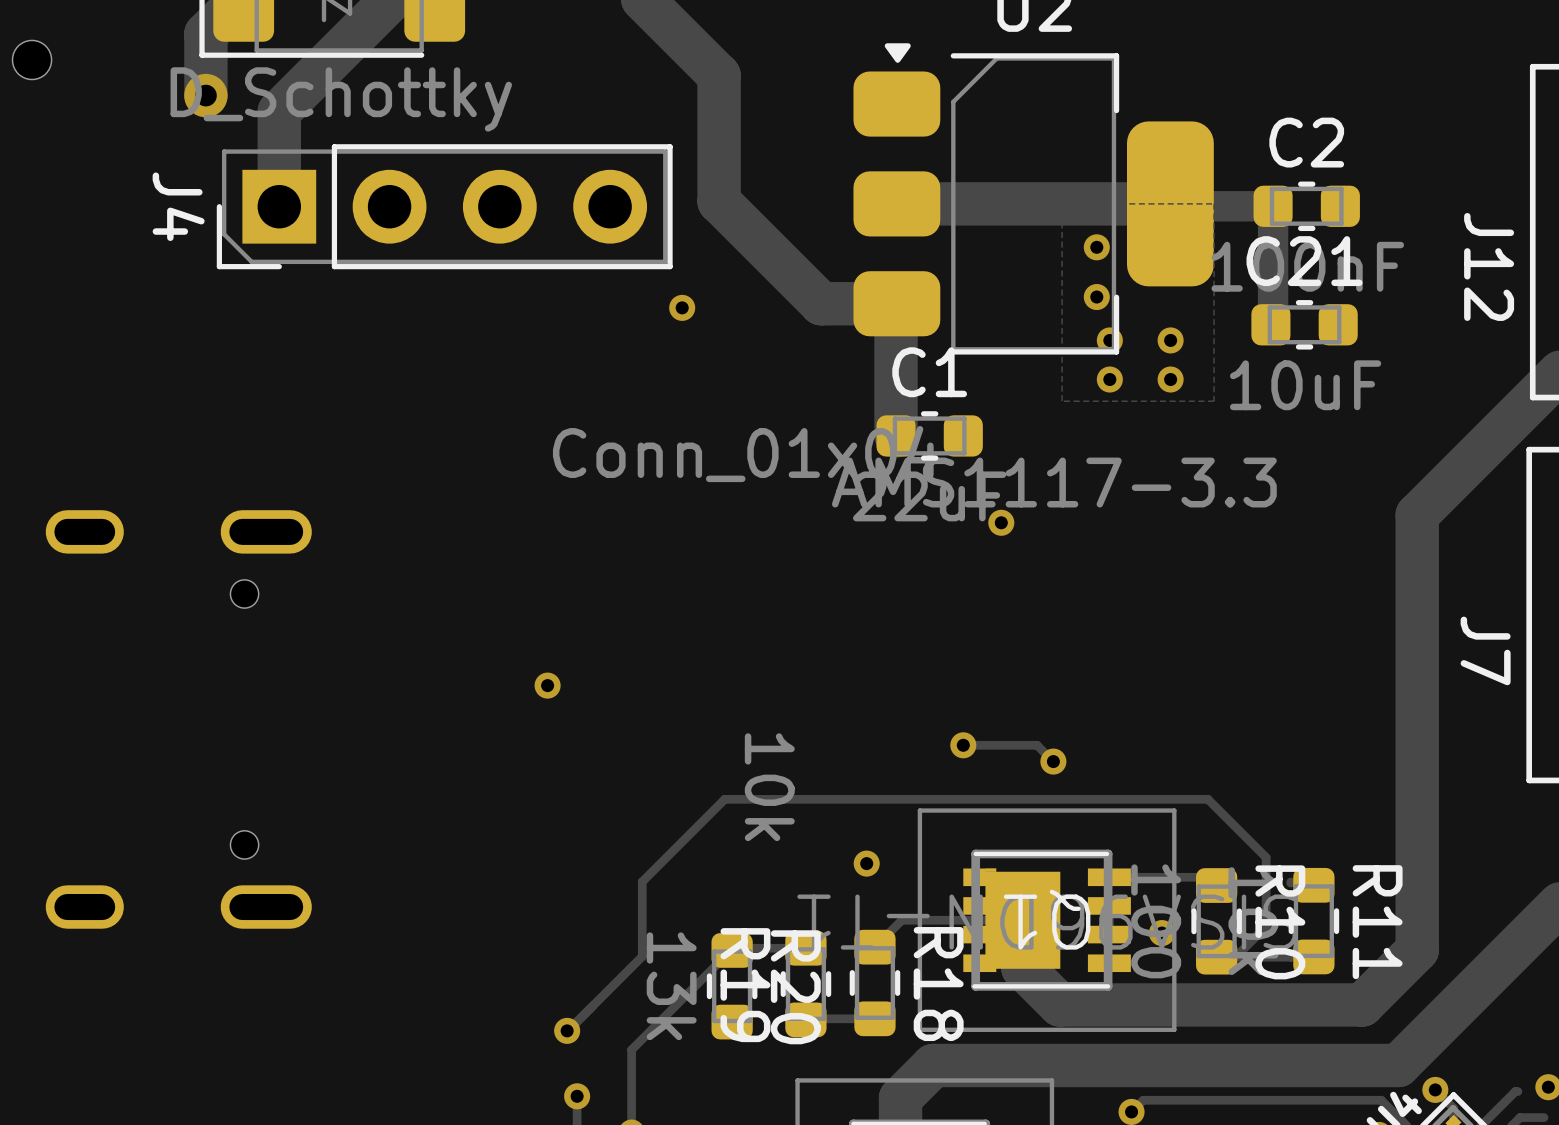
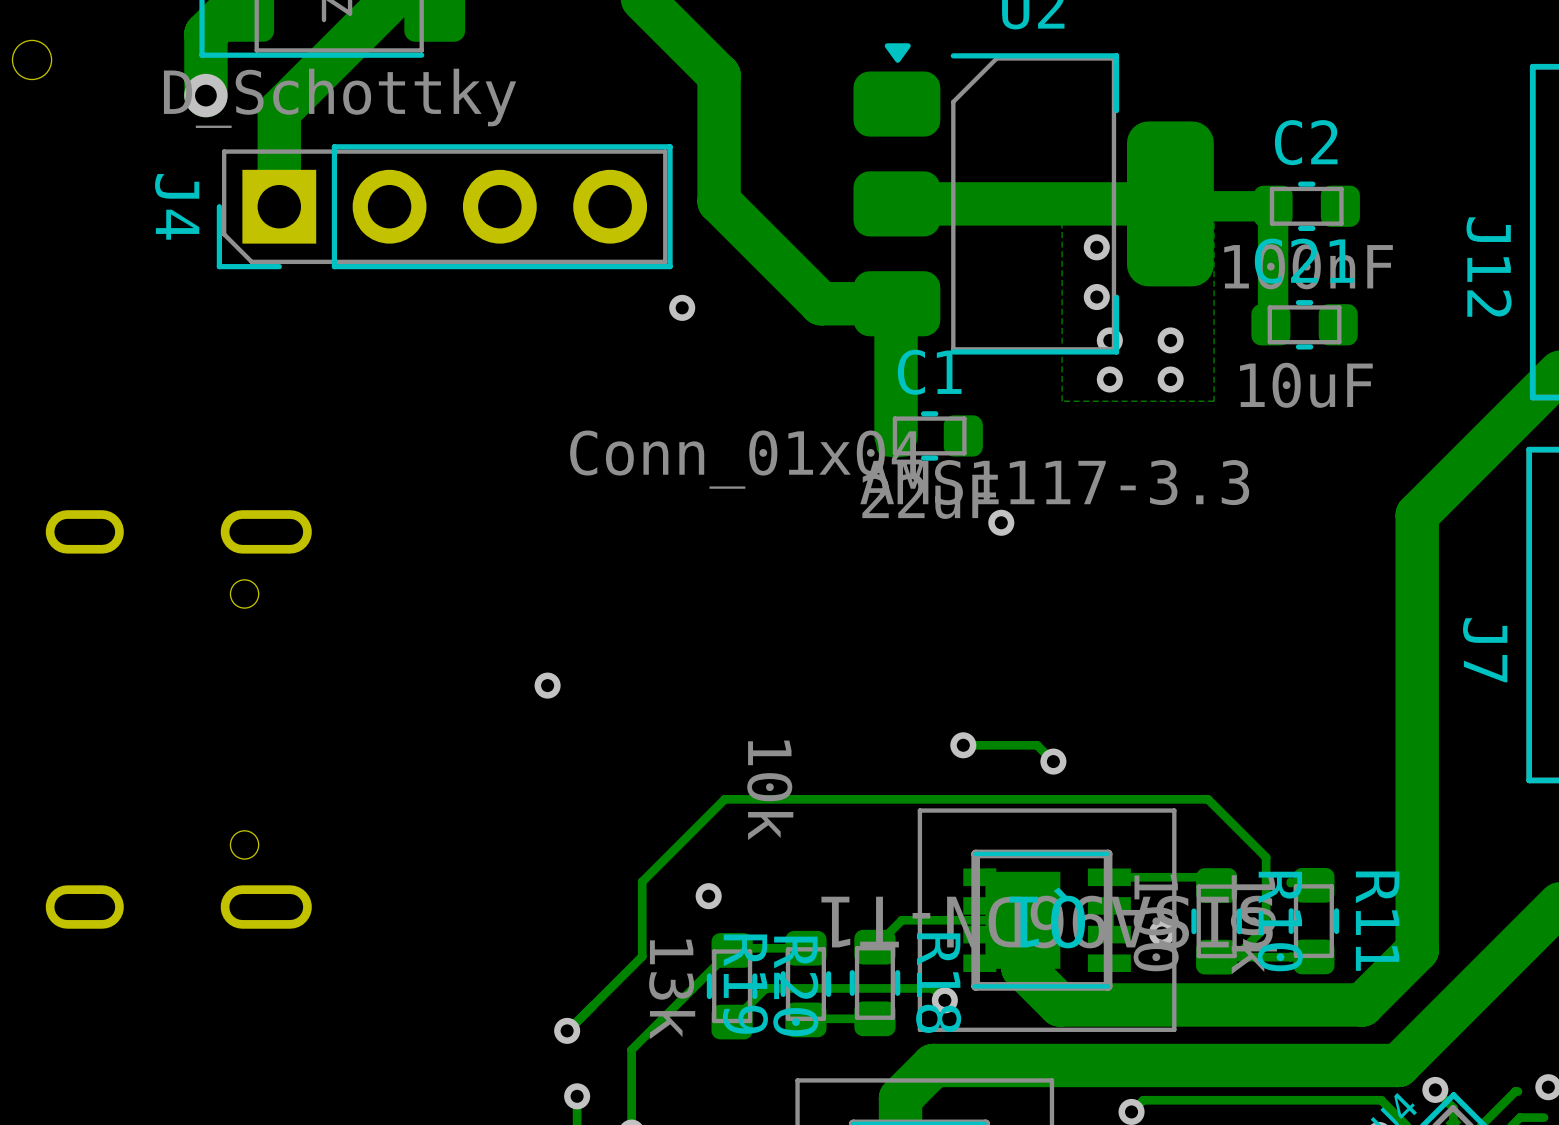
via position: (866, 863) -> (708, 896)
track: none -> (944, 1000) (932, 988) (765, 988) (732, 1022)
via: none -> (944, 1000)

